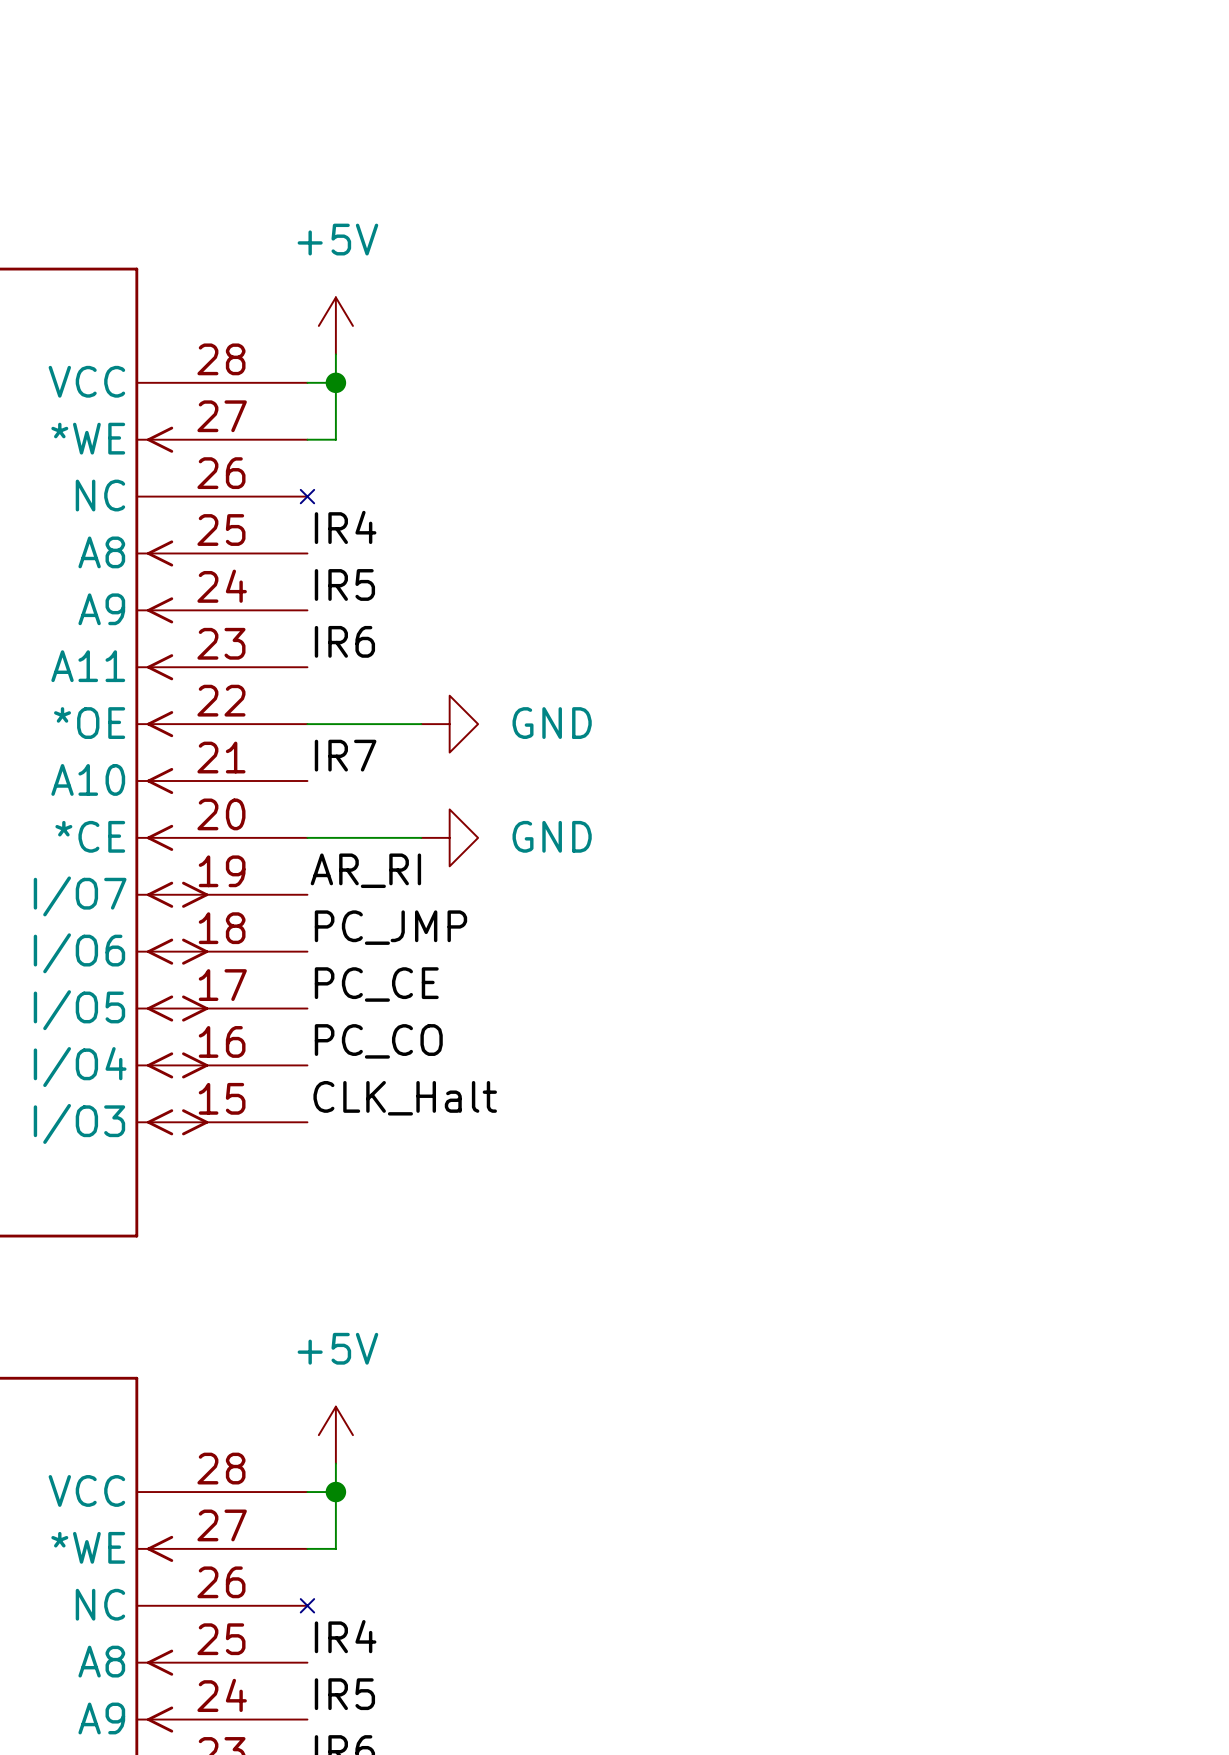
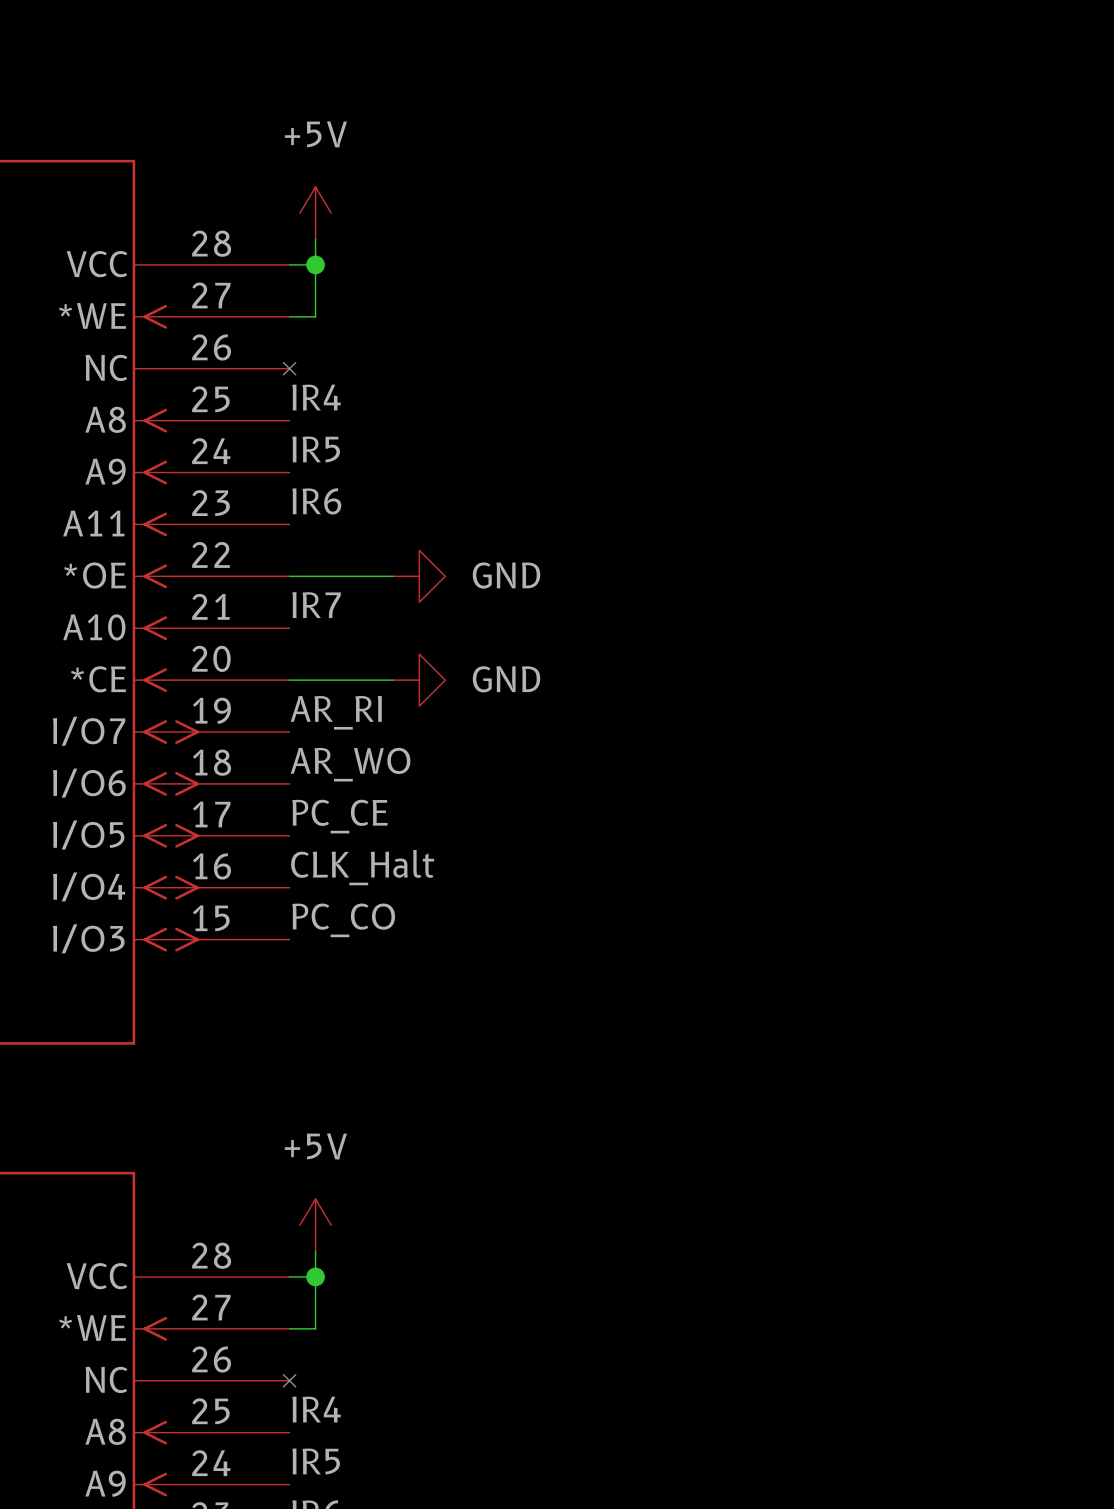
label: PC_JMP (390, 927) -> AR_WO (350, 764)
label: PC_CO (378, 1041) -> CLK_Halt (362, 867)
label: CLK_Halt (405, 1098) -> PC_CO (343, 920)

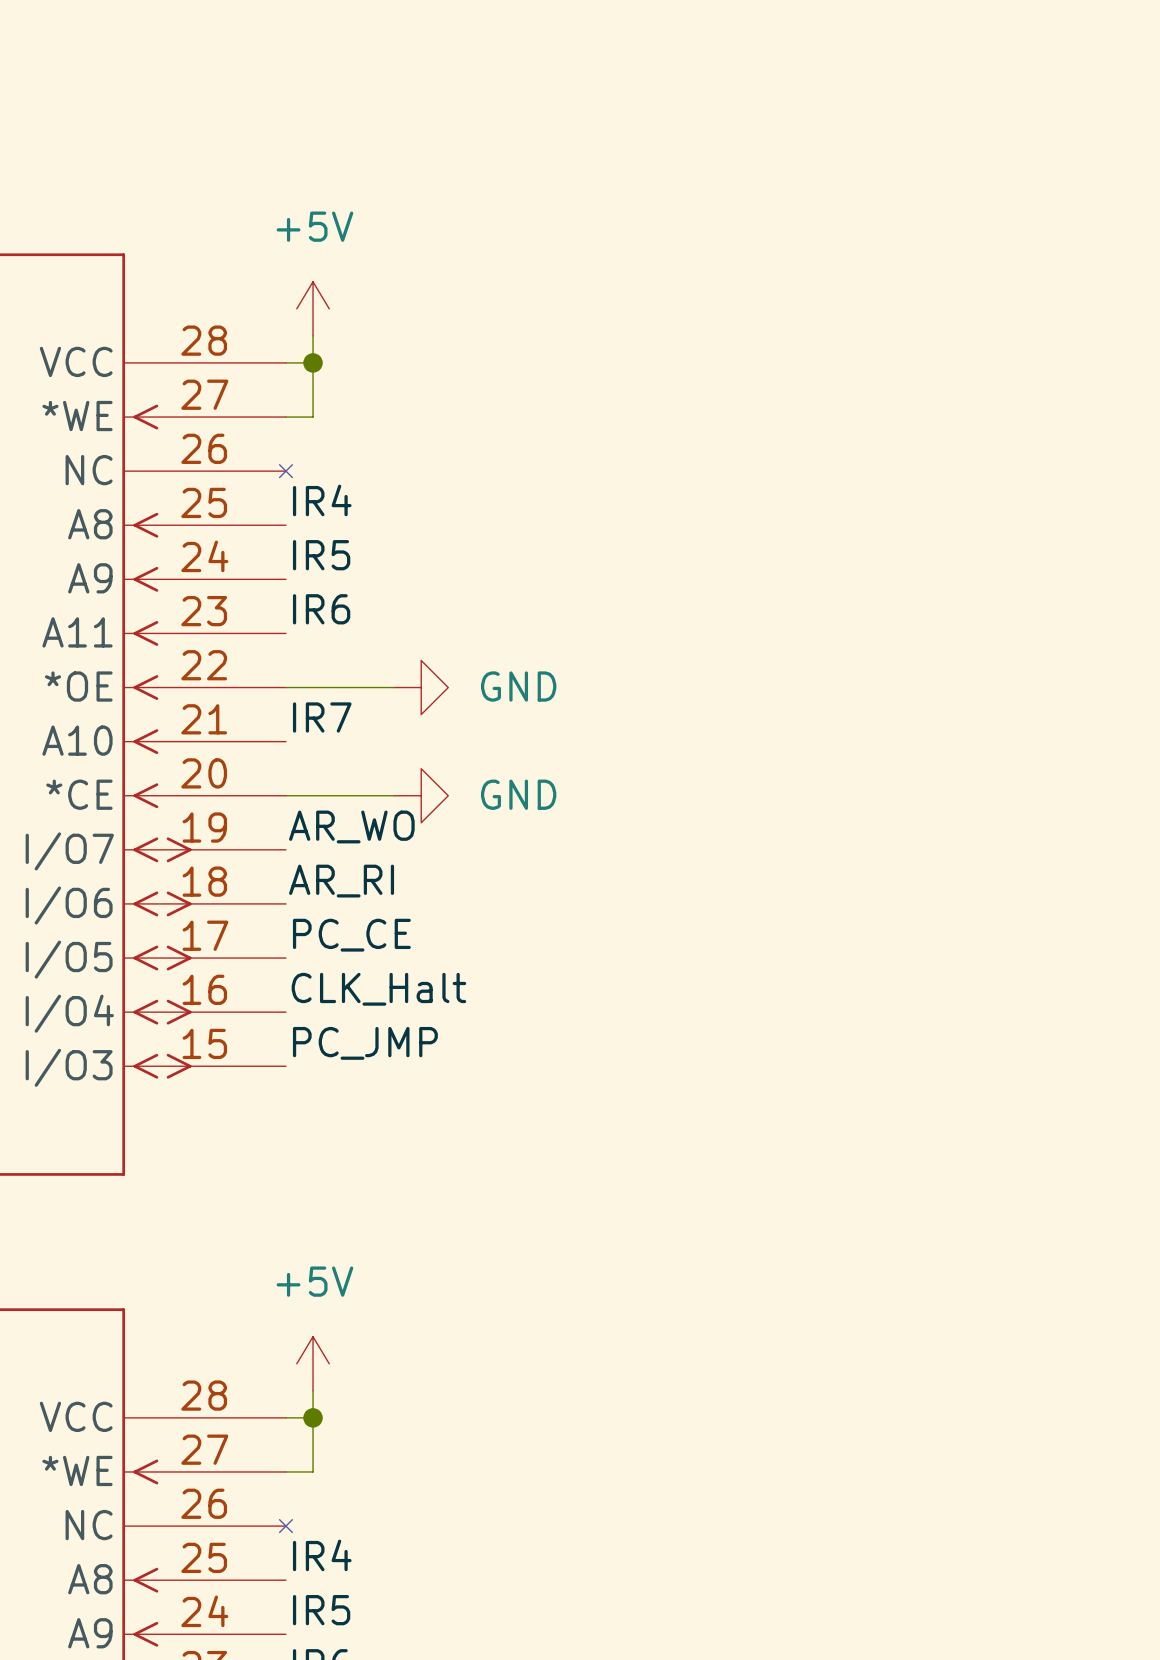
label: AR_RI (336, 712) -> AR_WO (351, 826)
label: AR_WO (350, 764) -> AR_RI (341, 881)
label: PC_CO (343, 920) -> PC_JMP (365, 1043)

